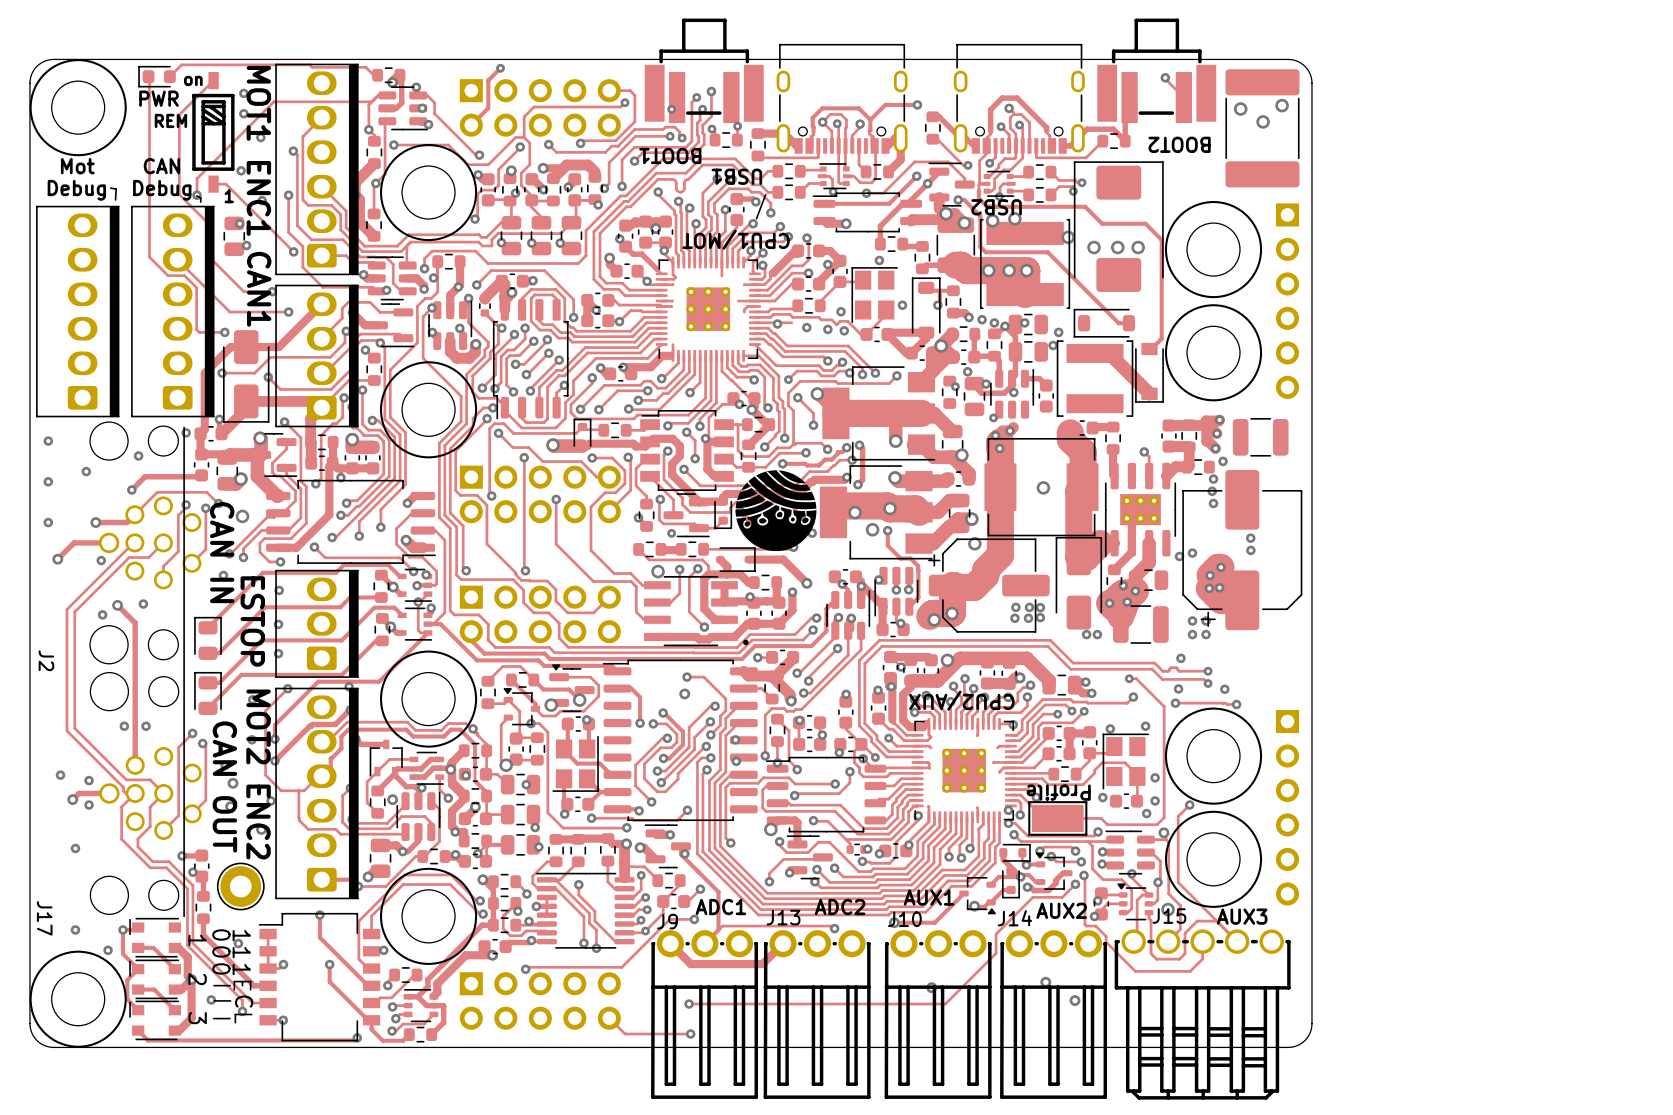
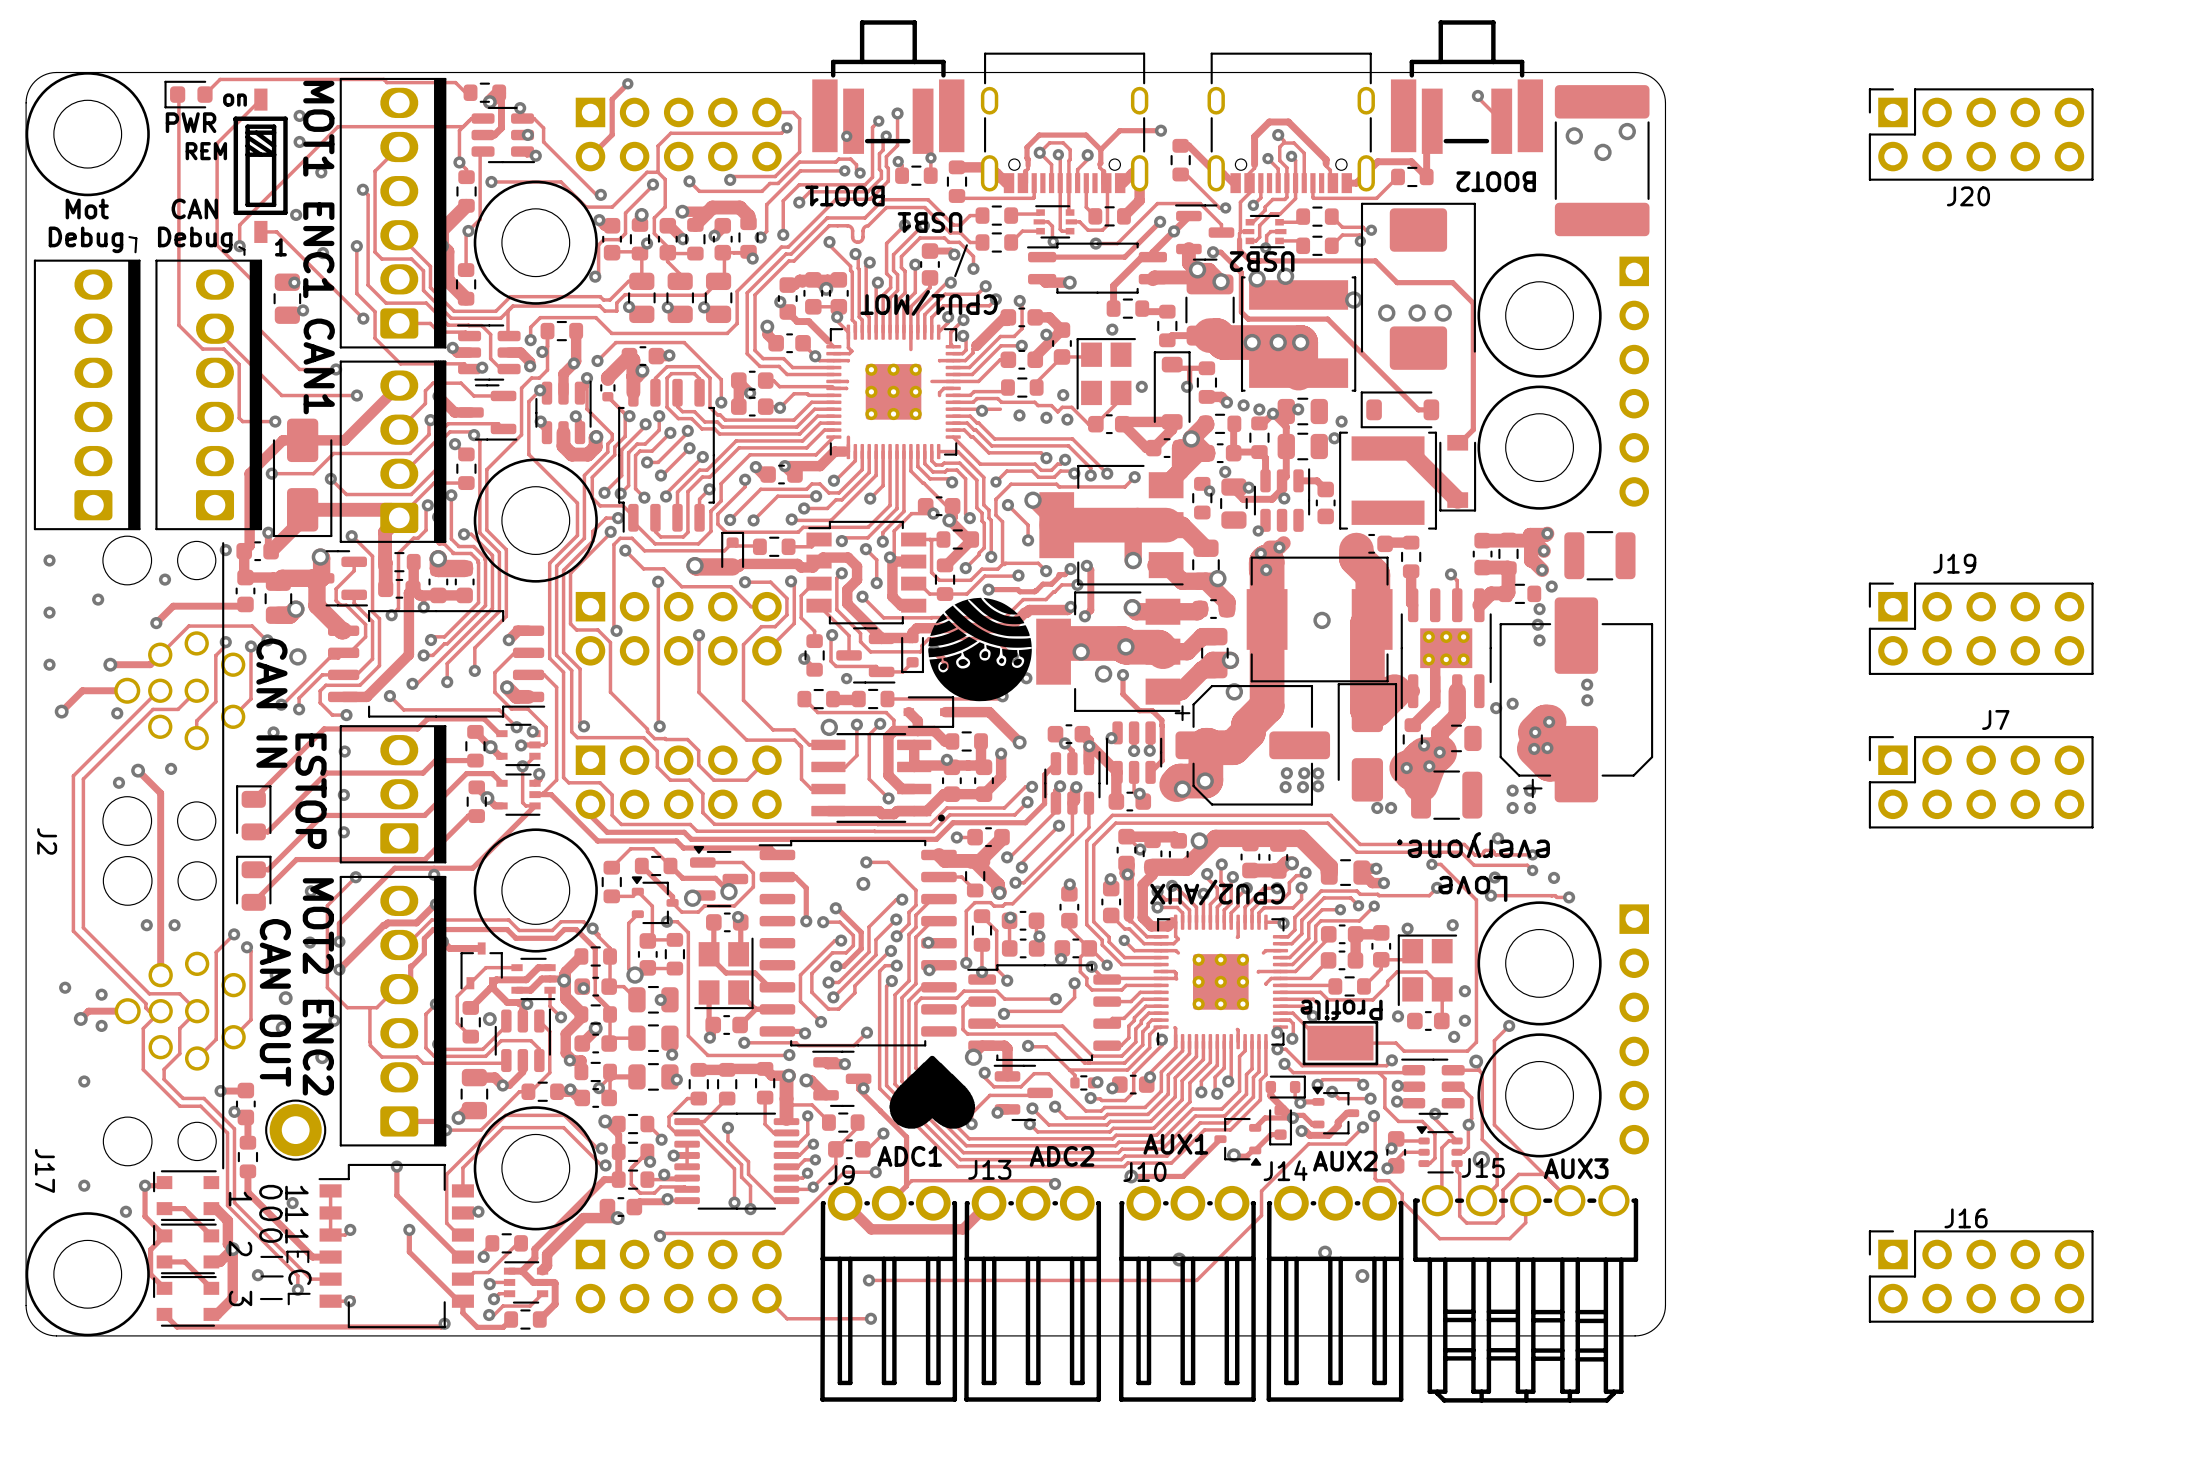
J20: none -> (1981, 134)
J19: none -> (1981, 628)
J7: none -> (1981, 782)
text: none -> everyone. (1473, 845)
text: none -> Love (1472, 888)
drawing: none -> [889, 1055, 976, 1129]
J16: none -> (1981, 1276)

